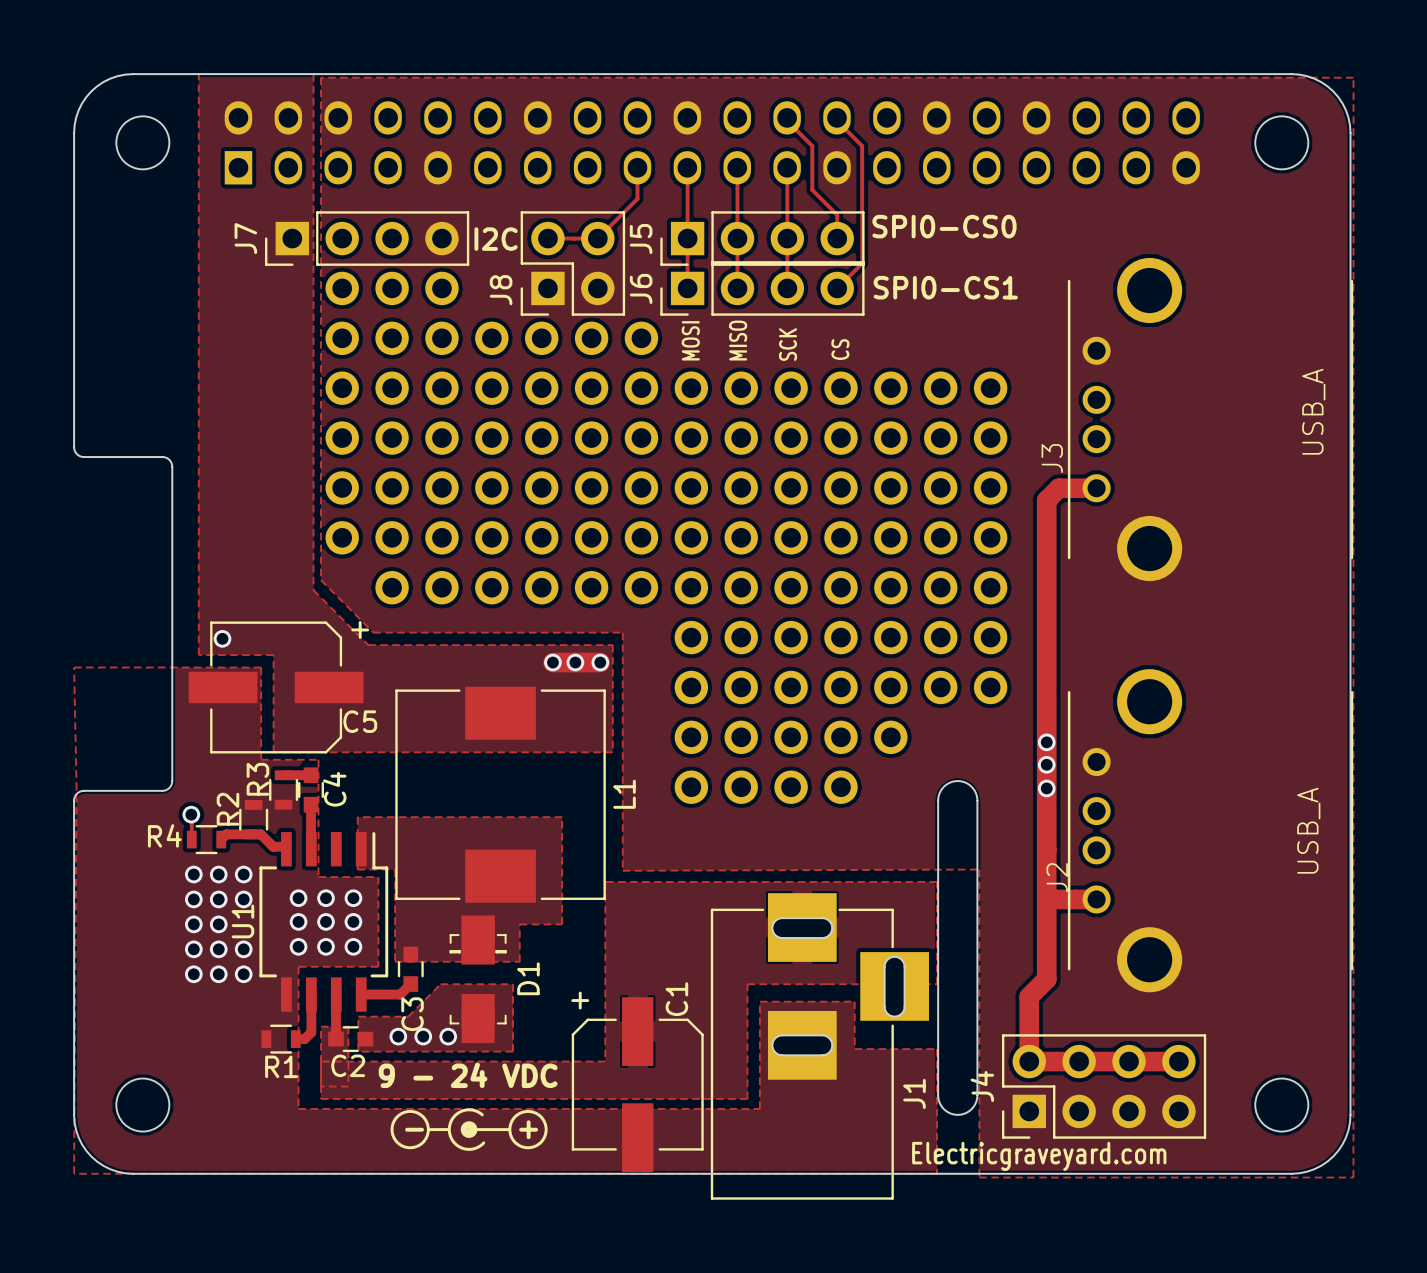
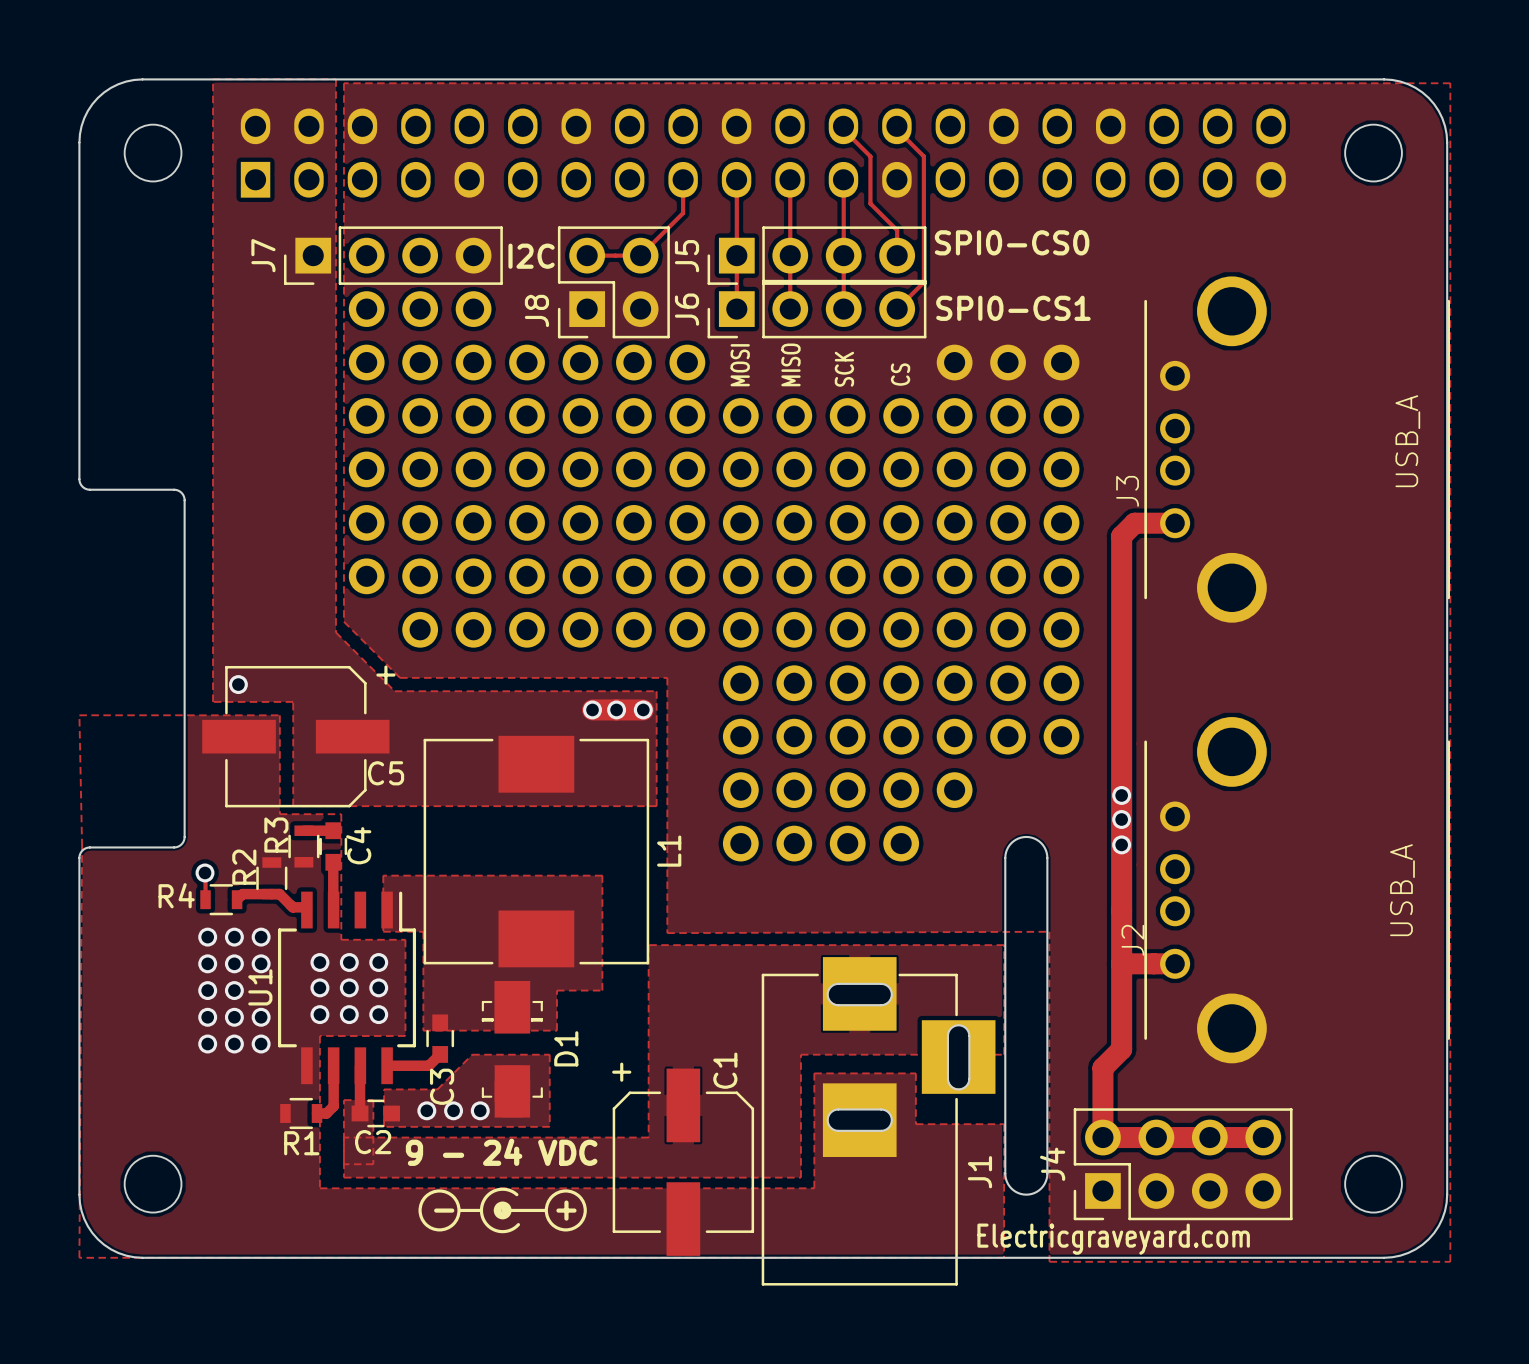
part: none -> (954, 362)
part: none -> (1008, 362)
part: none -> (1061, 362)

